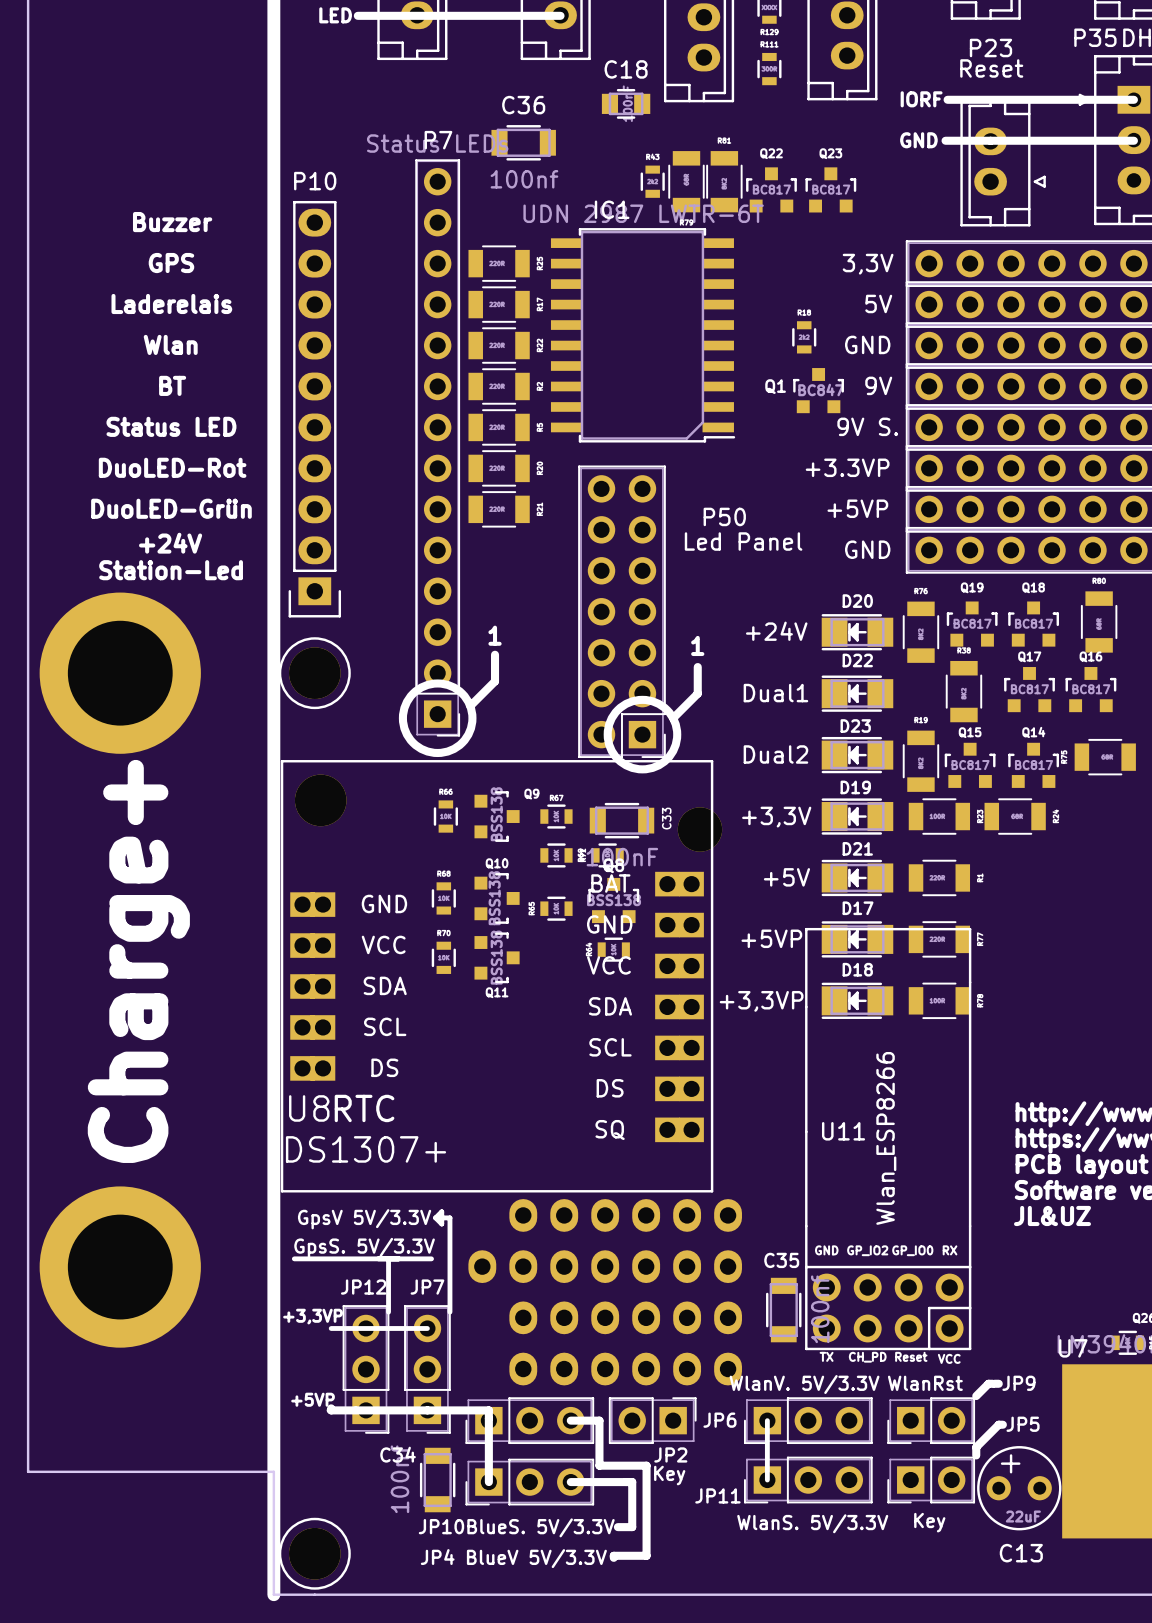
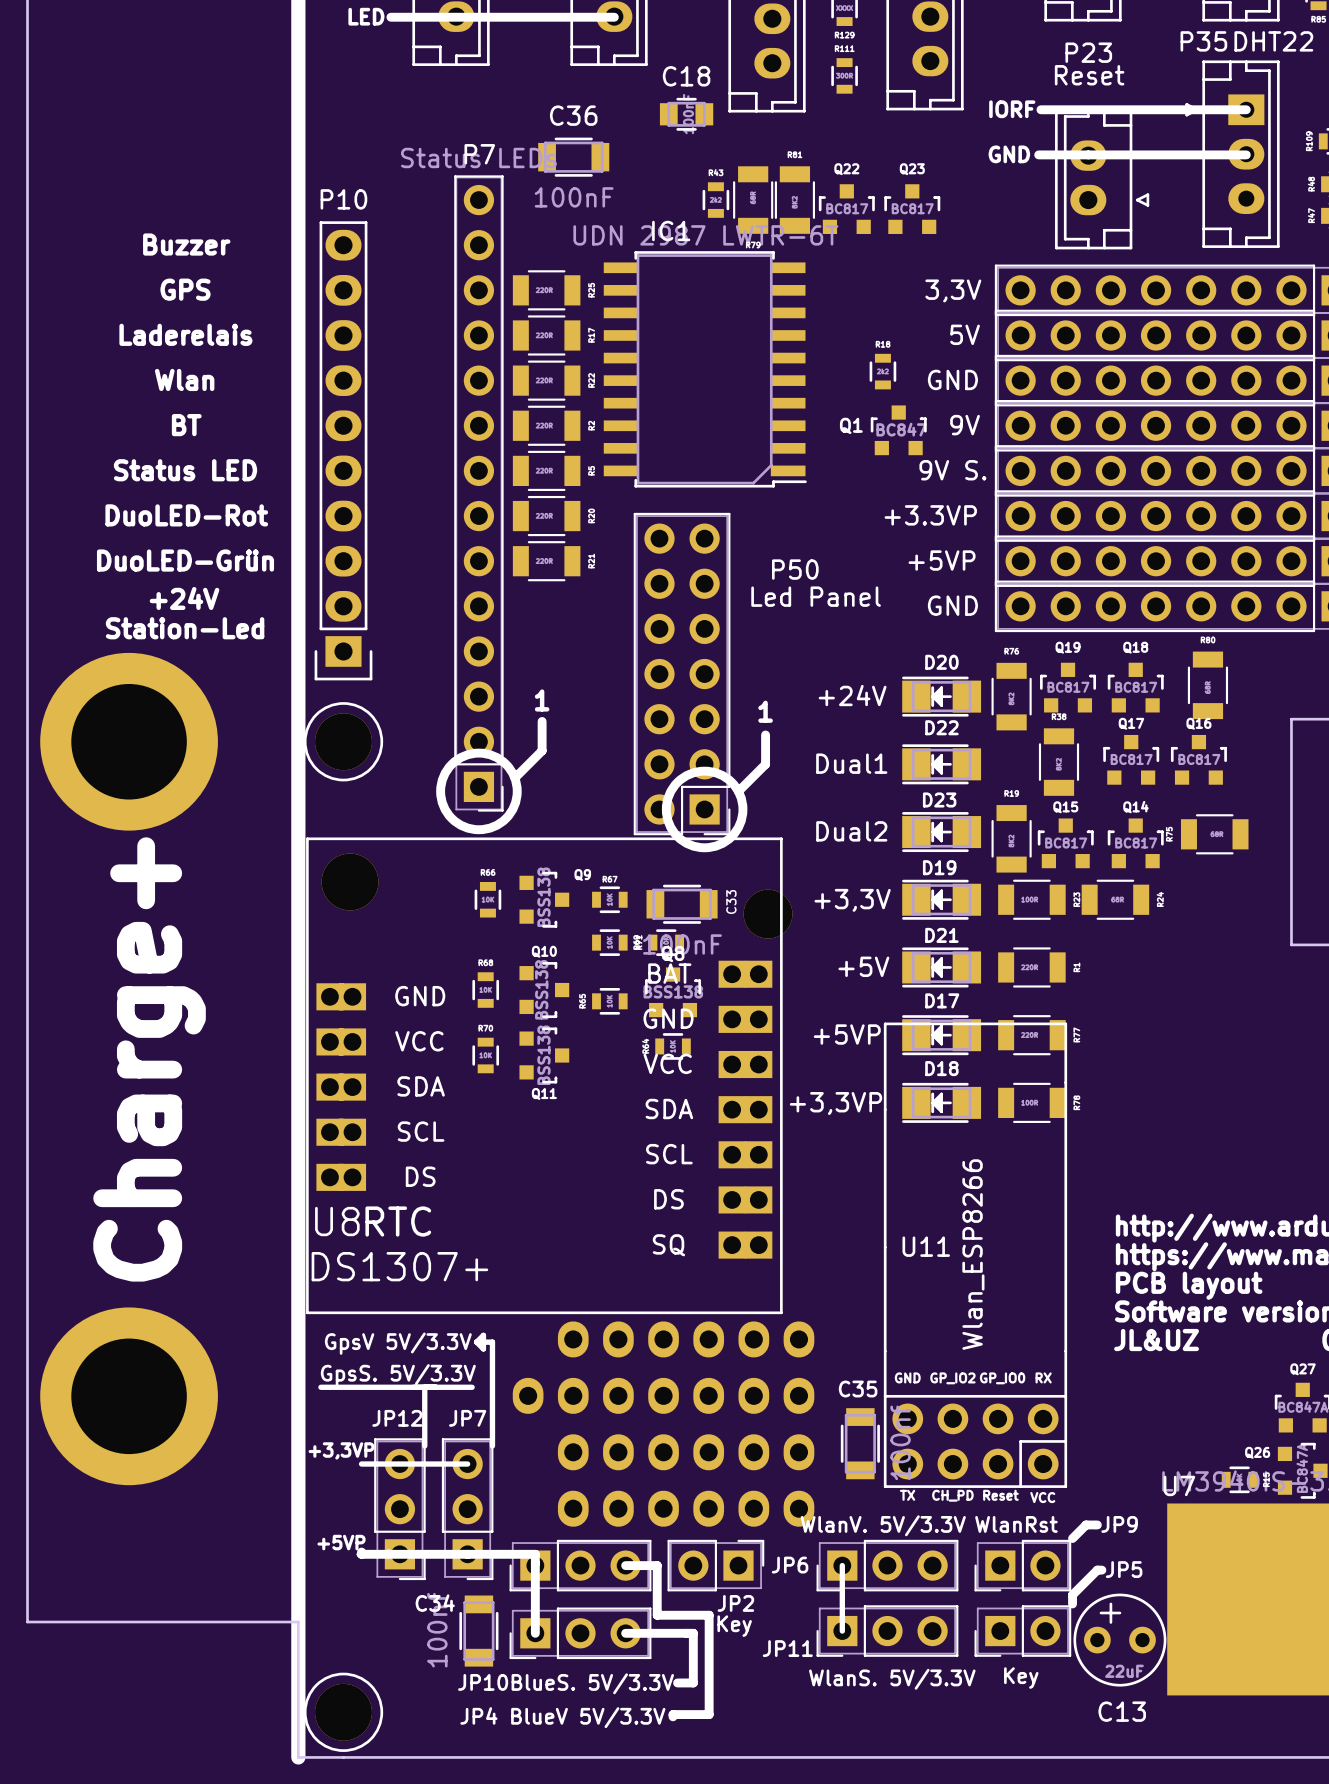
C36 value: 100nf (524, 179) -> 100nF (574, 197)

